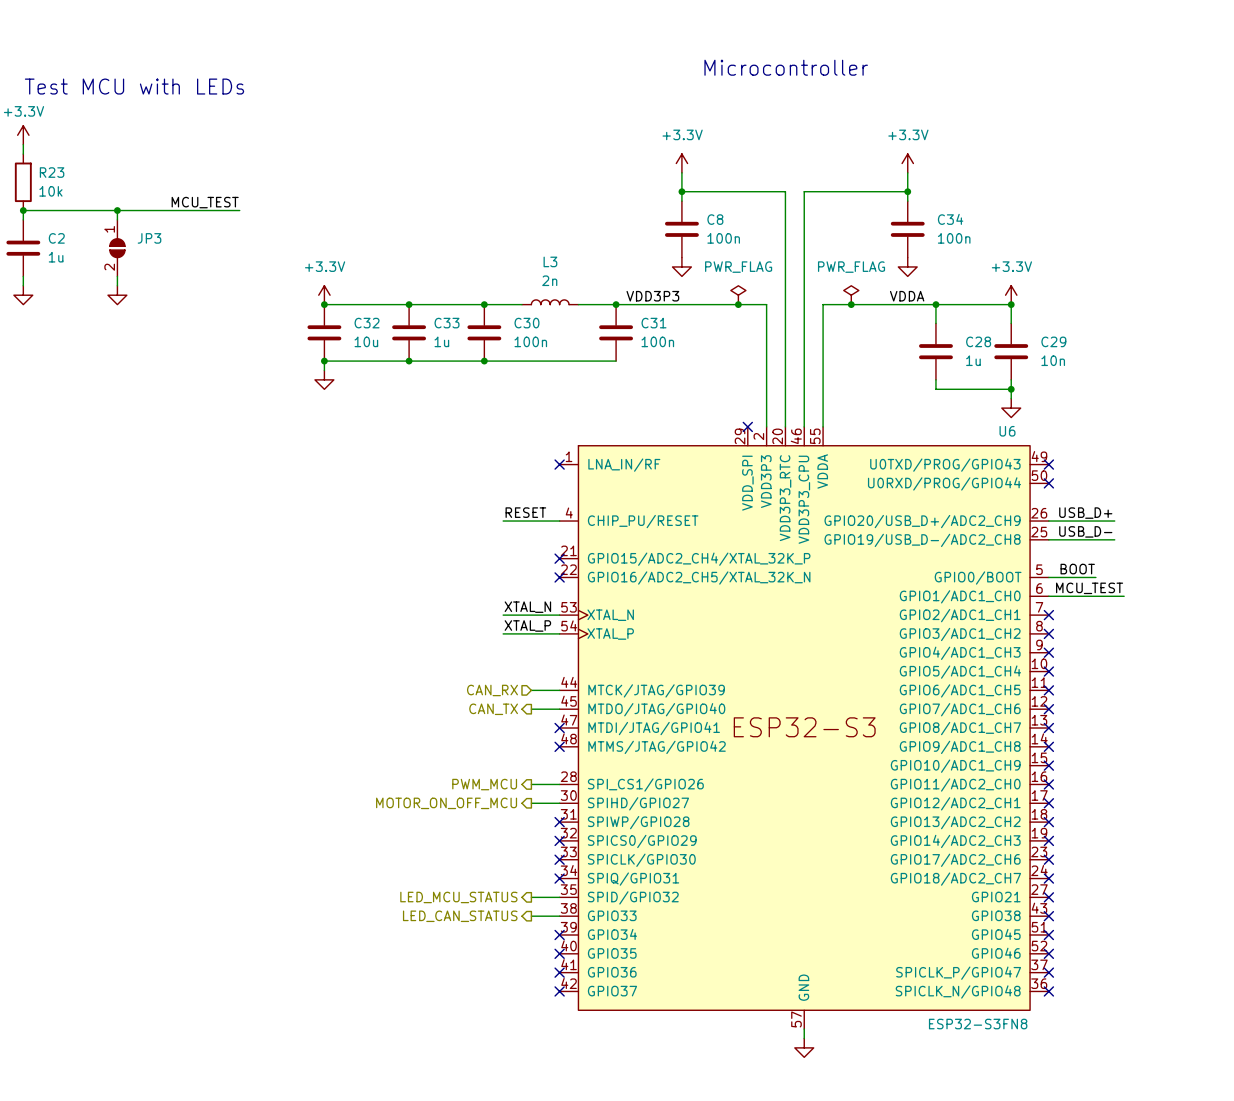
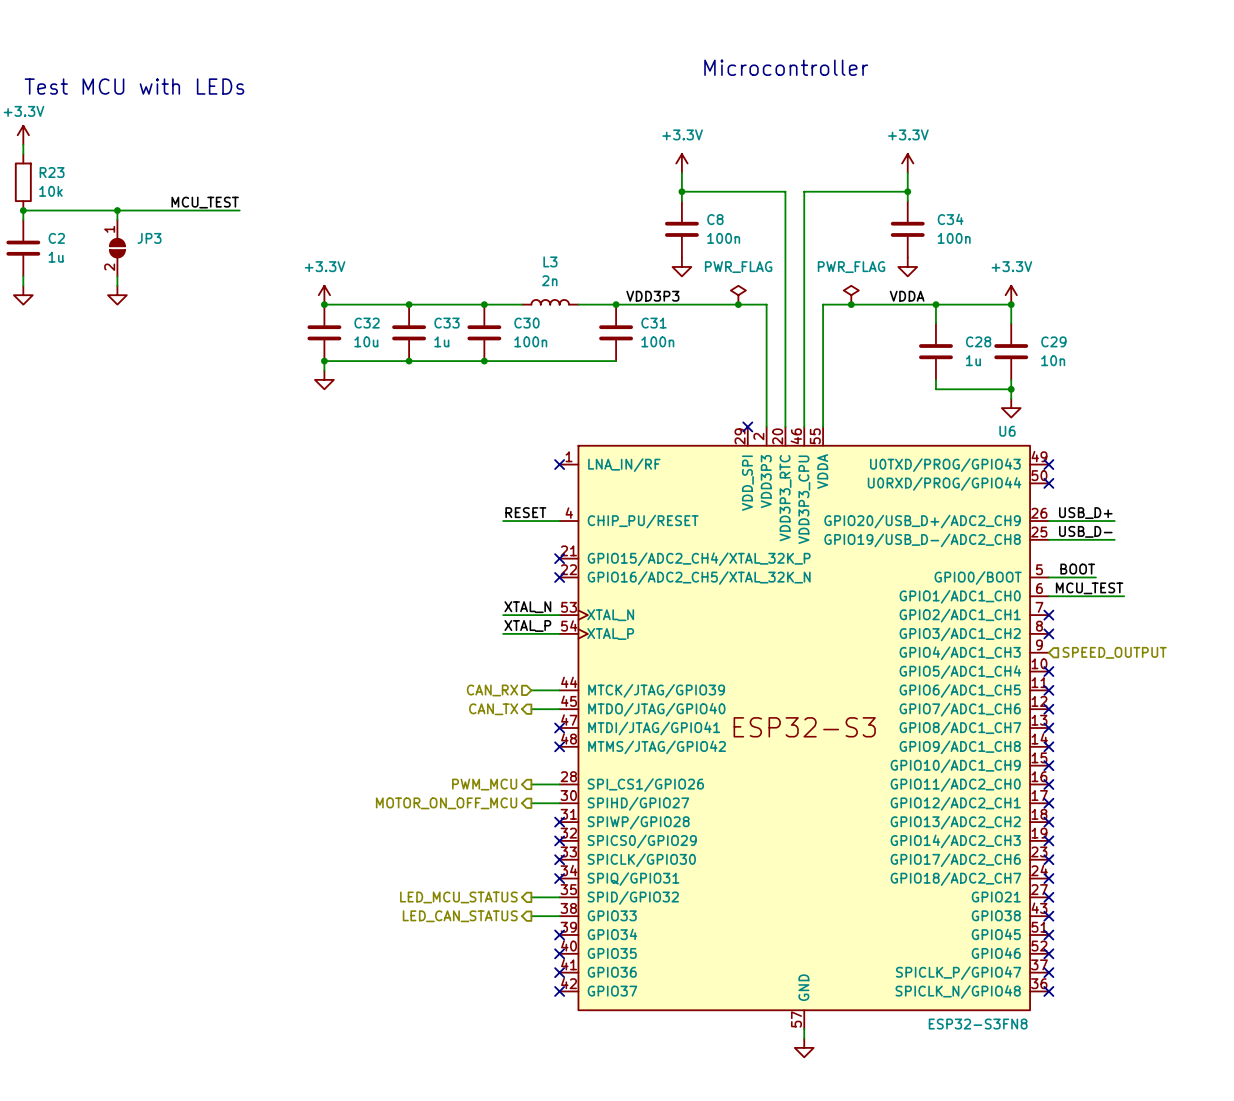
no-connect mark: (1048, 652) -> none
hierarchical label: none -> SPEED_OUTPUT (1114, 652)

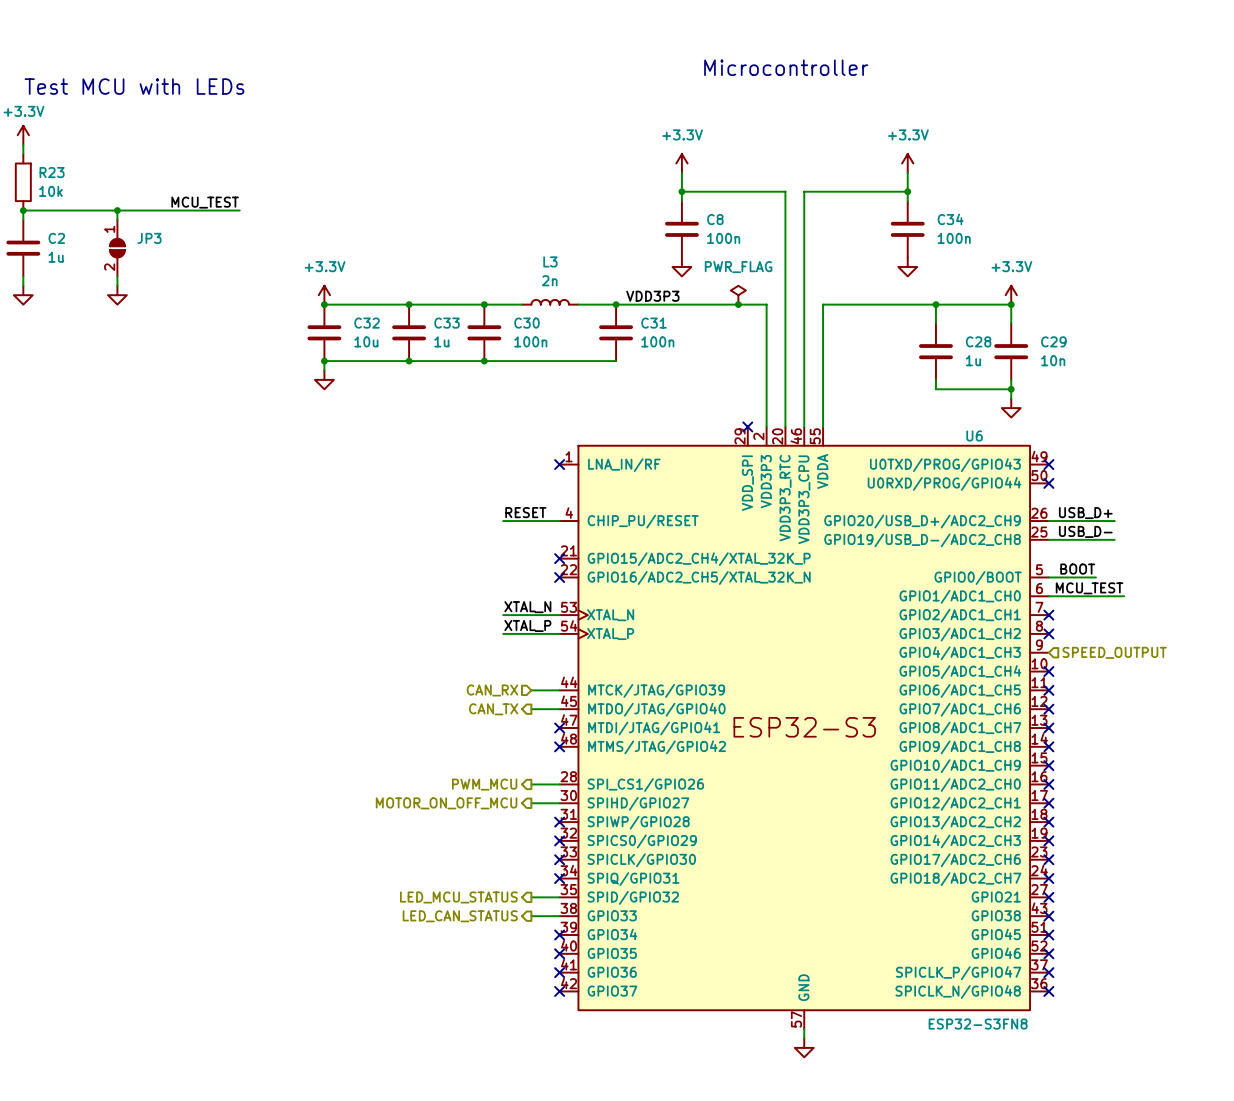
power symbol: PWR_FLAG (851, 295) -> none
label: VDDA (907, 296) -> none
junction: (851, 304) -> none
U6 name position: U6 (1007, 431) -> U6 (974, 435)

